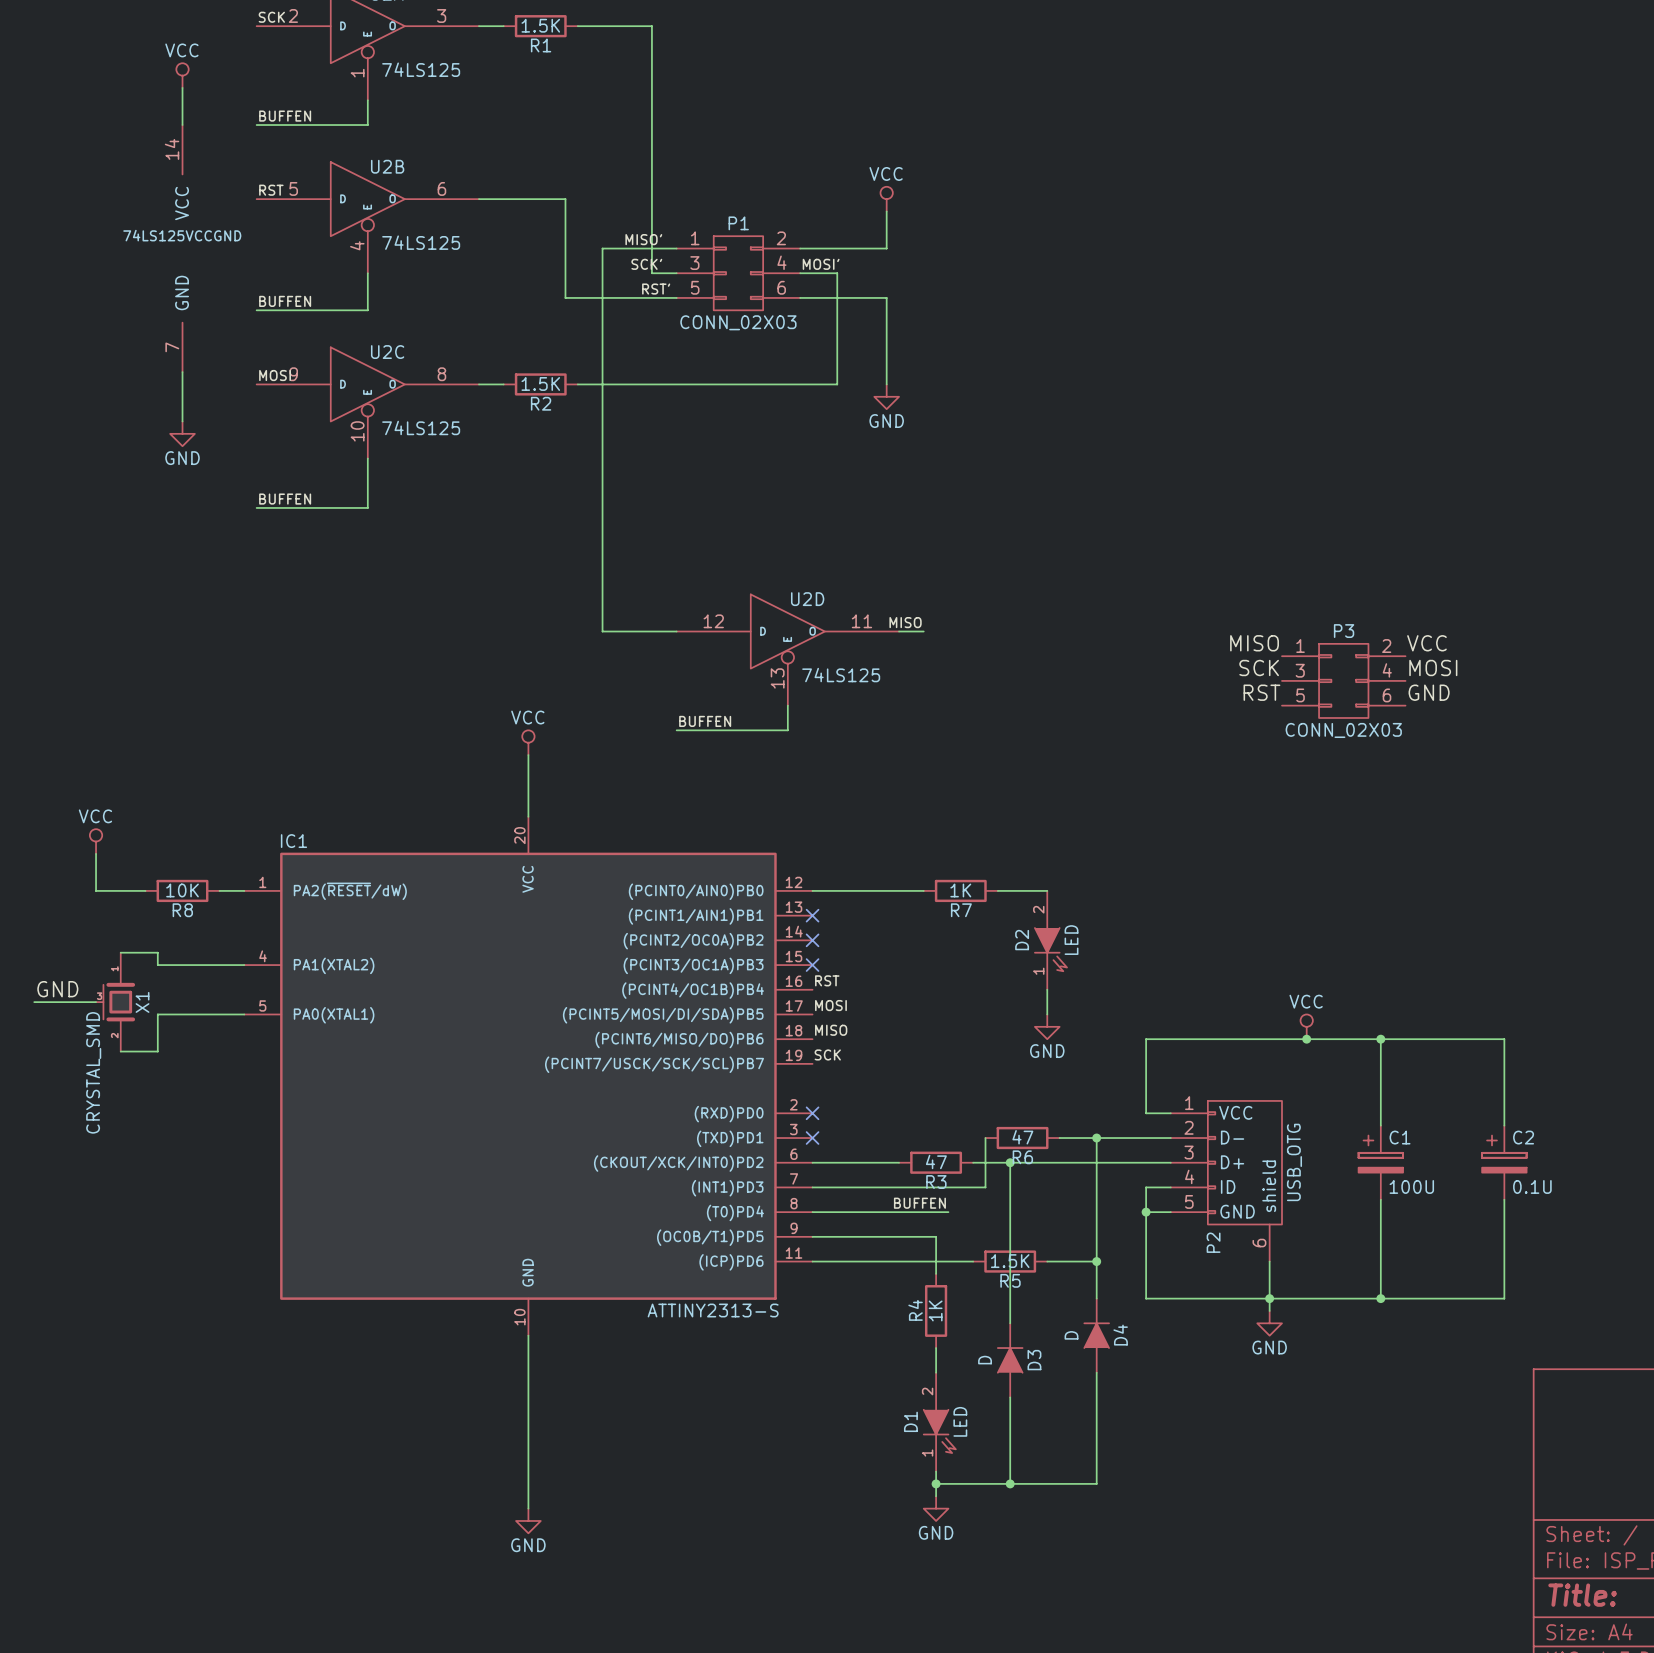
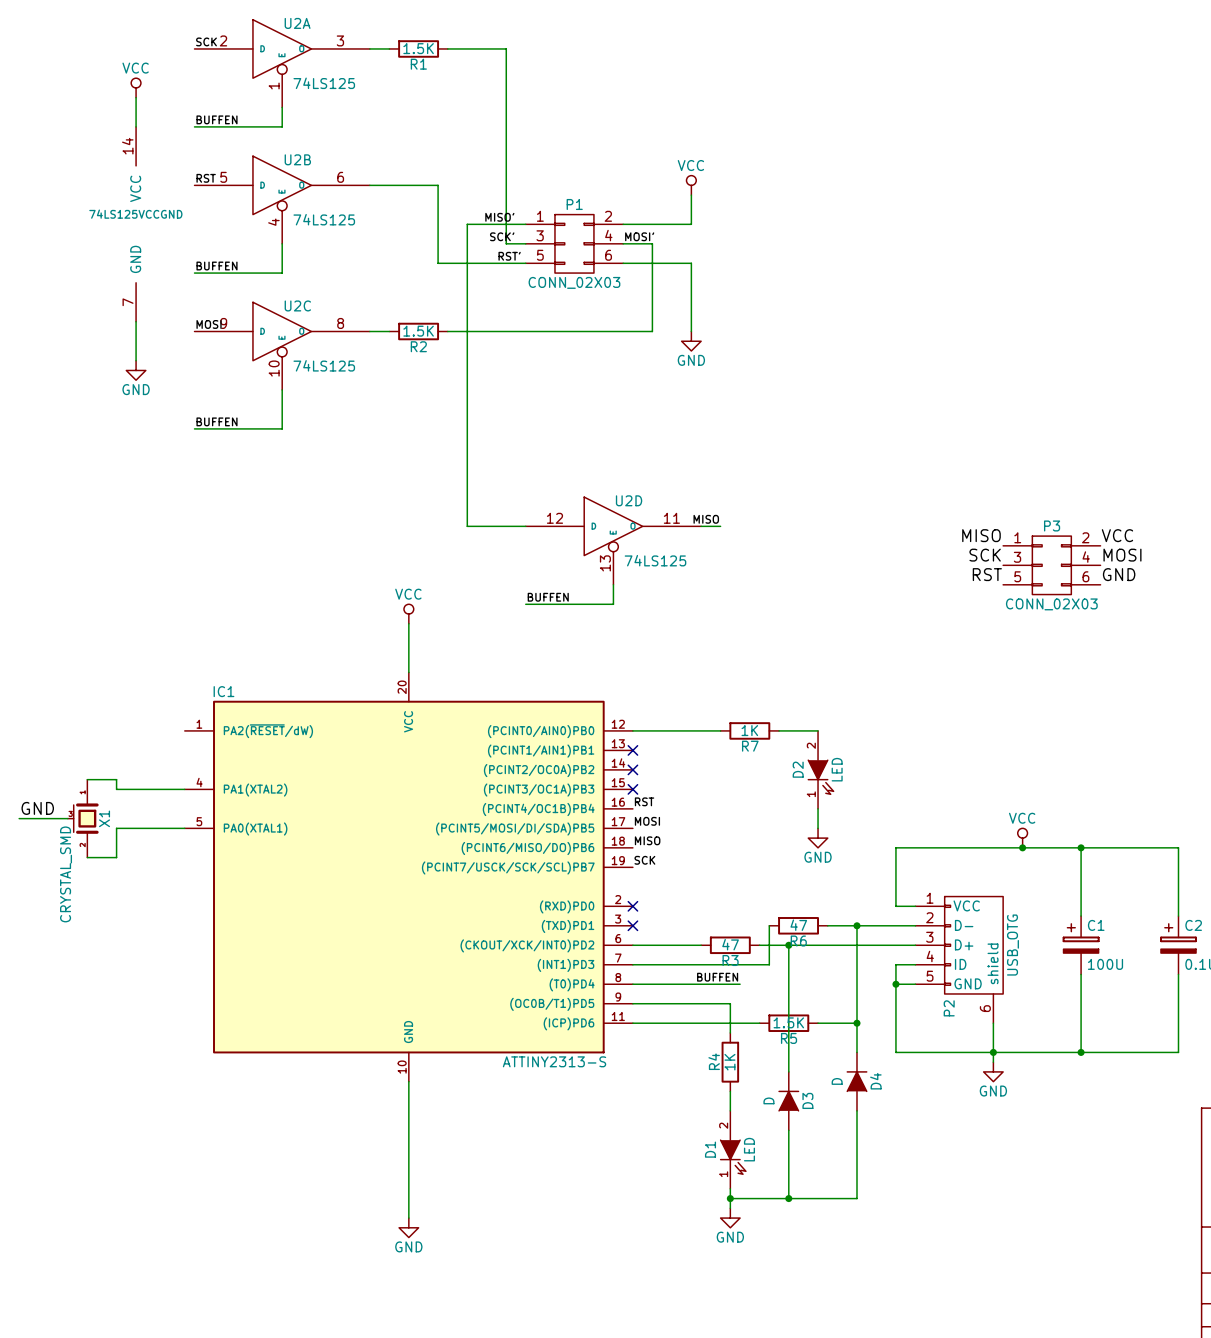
power symbol: VCC (96, 841) -> none
wire: (96, 853) (96, 890) (145, 890) -> none
R8: 10K (182, 890) -> none
wire: (219, 890) (244, 890) -> none

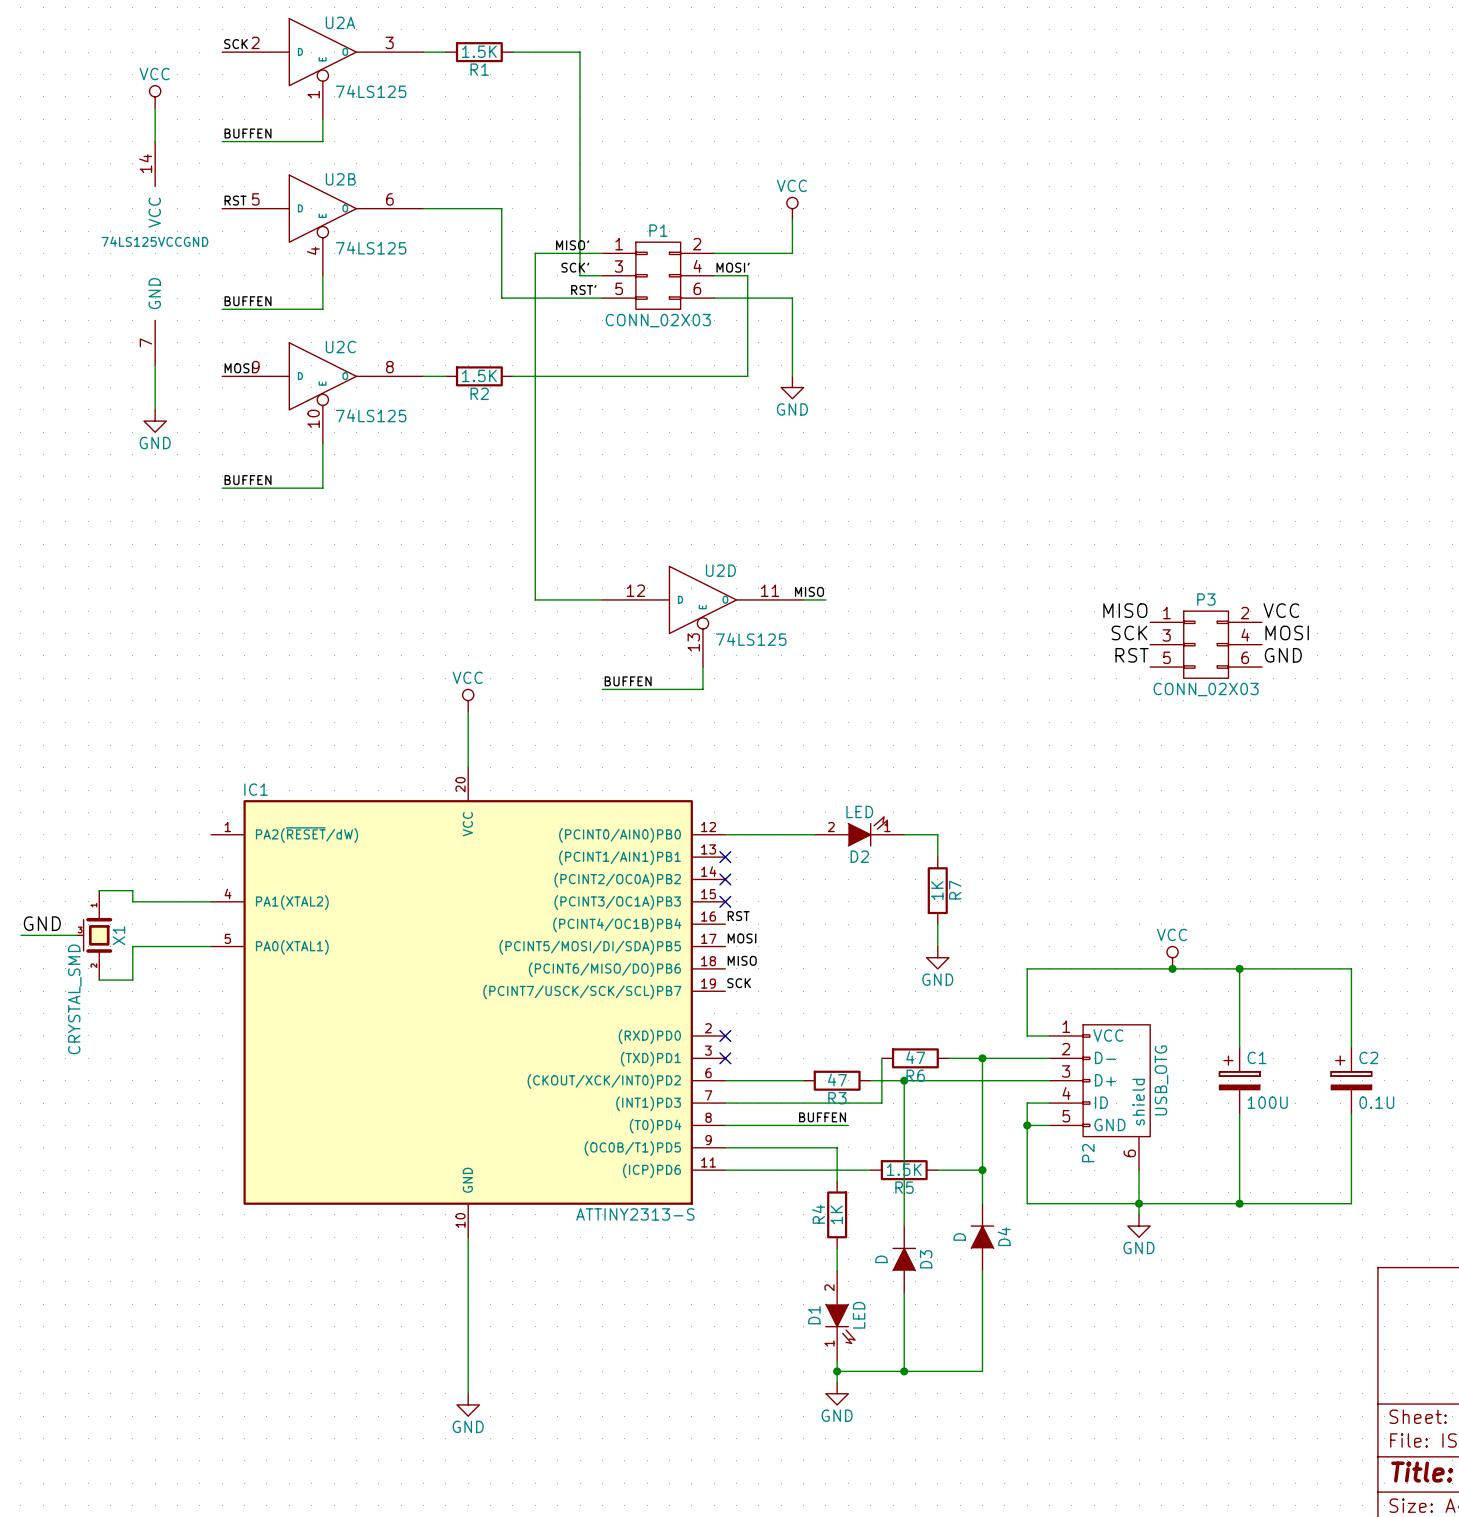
R7 rotation: 0° (749, 730) -> 90° clockwise (937, 890)
R7 position: (749, 730) -> (937, 890)
R7 name position: R7 (750, 746) -> R7 (955, 890)
D2 position: (820, 769) -> (859, 831)
D2 rotation: 0° (820, 777) -> 90° counterclockwise (867, 831)

